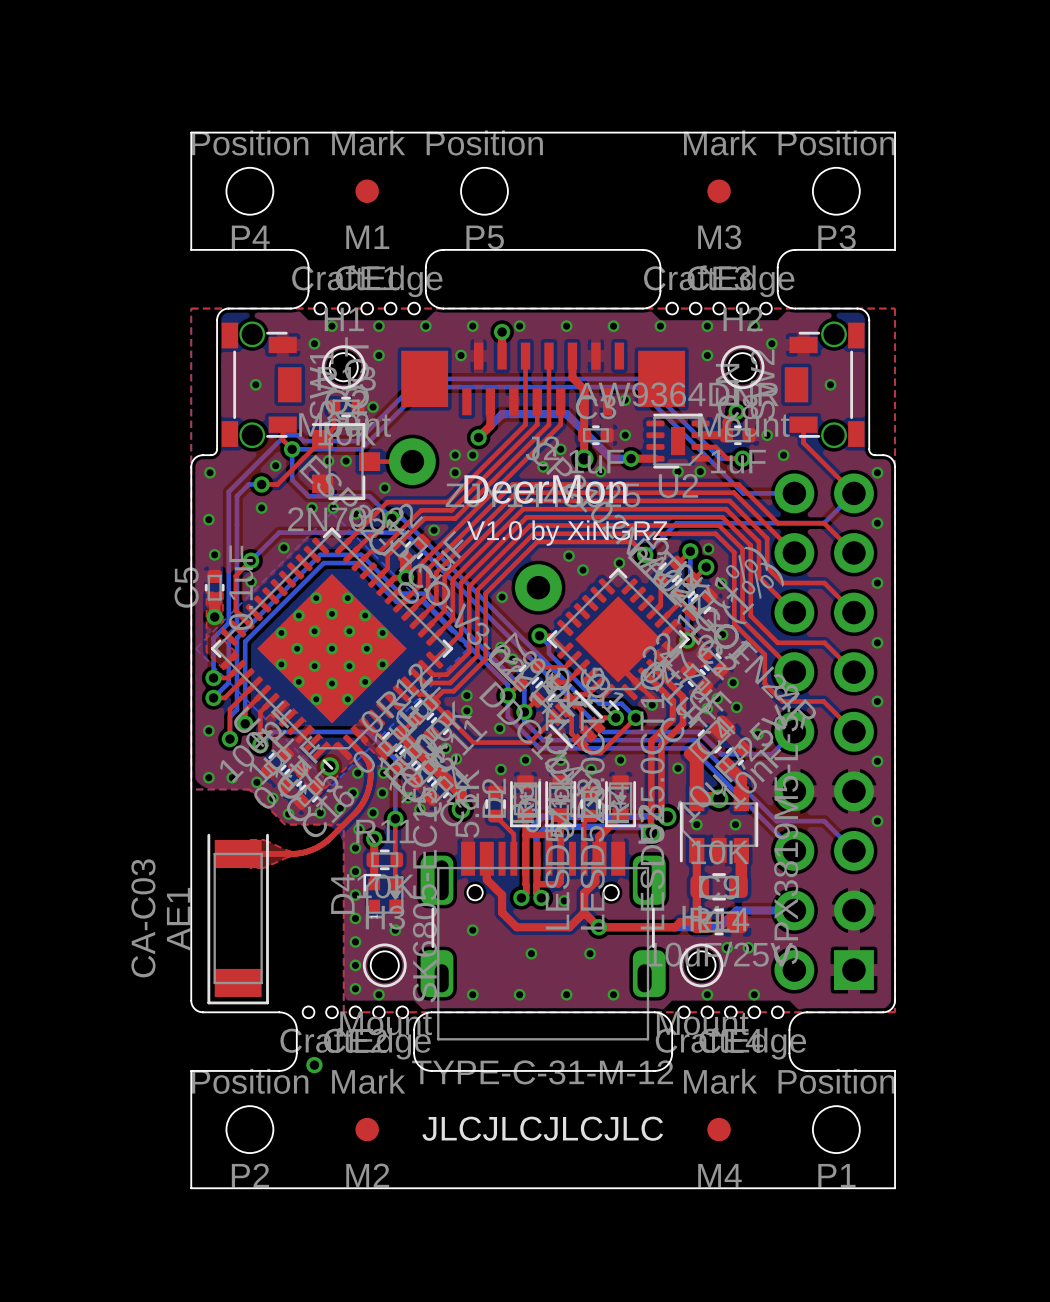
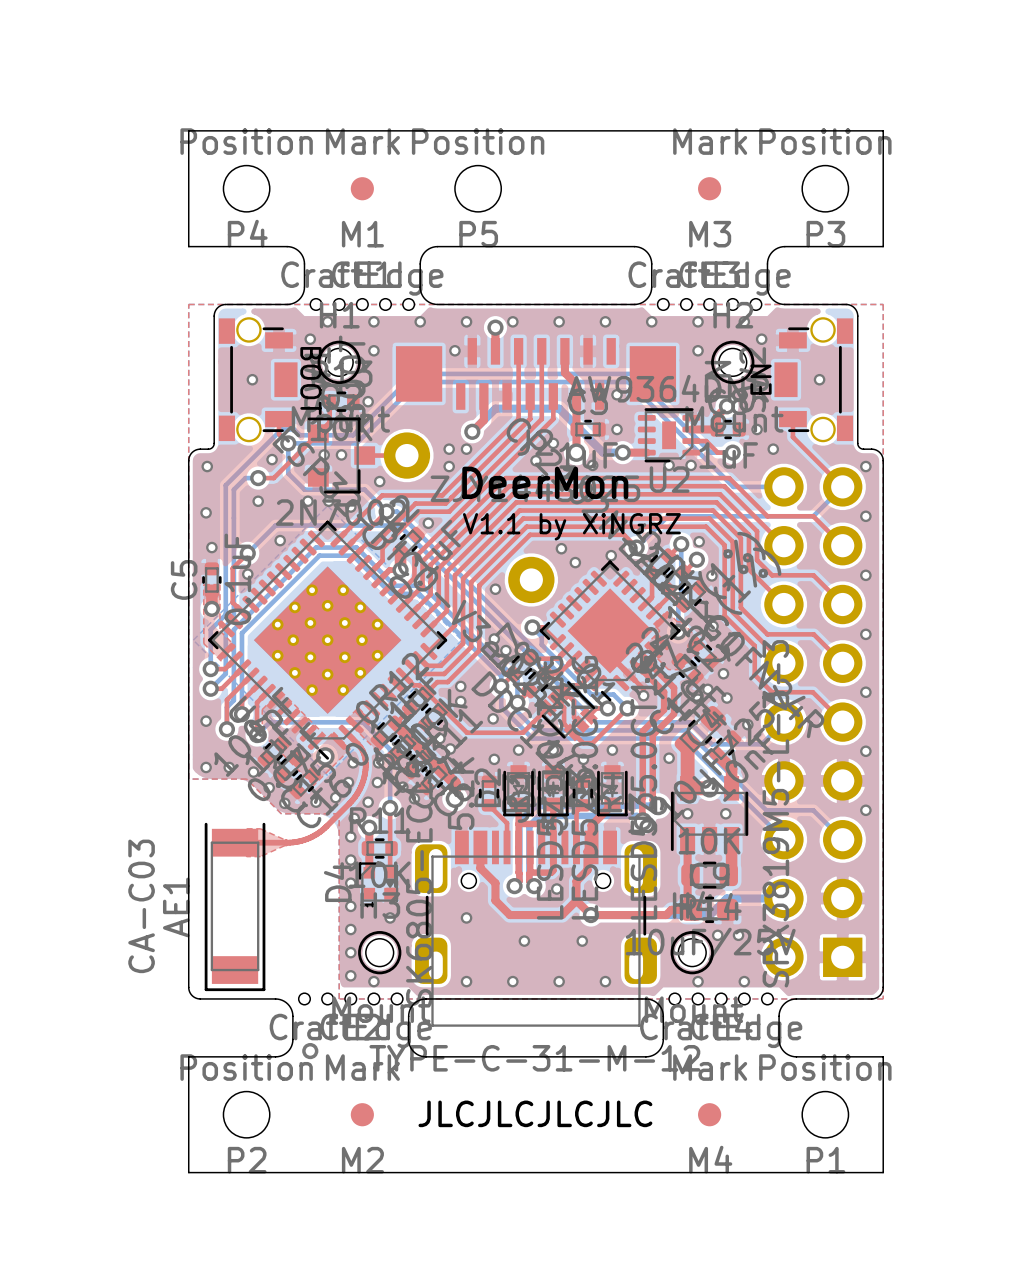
text: none -> EN (761, 379)
text: none -> BOOT (310, 381)
text: V1.0 by XiNGRZ (567, 533) -> V1.1 by XiNGRZ (571, 526)

